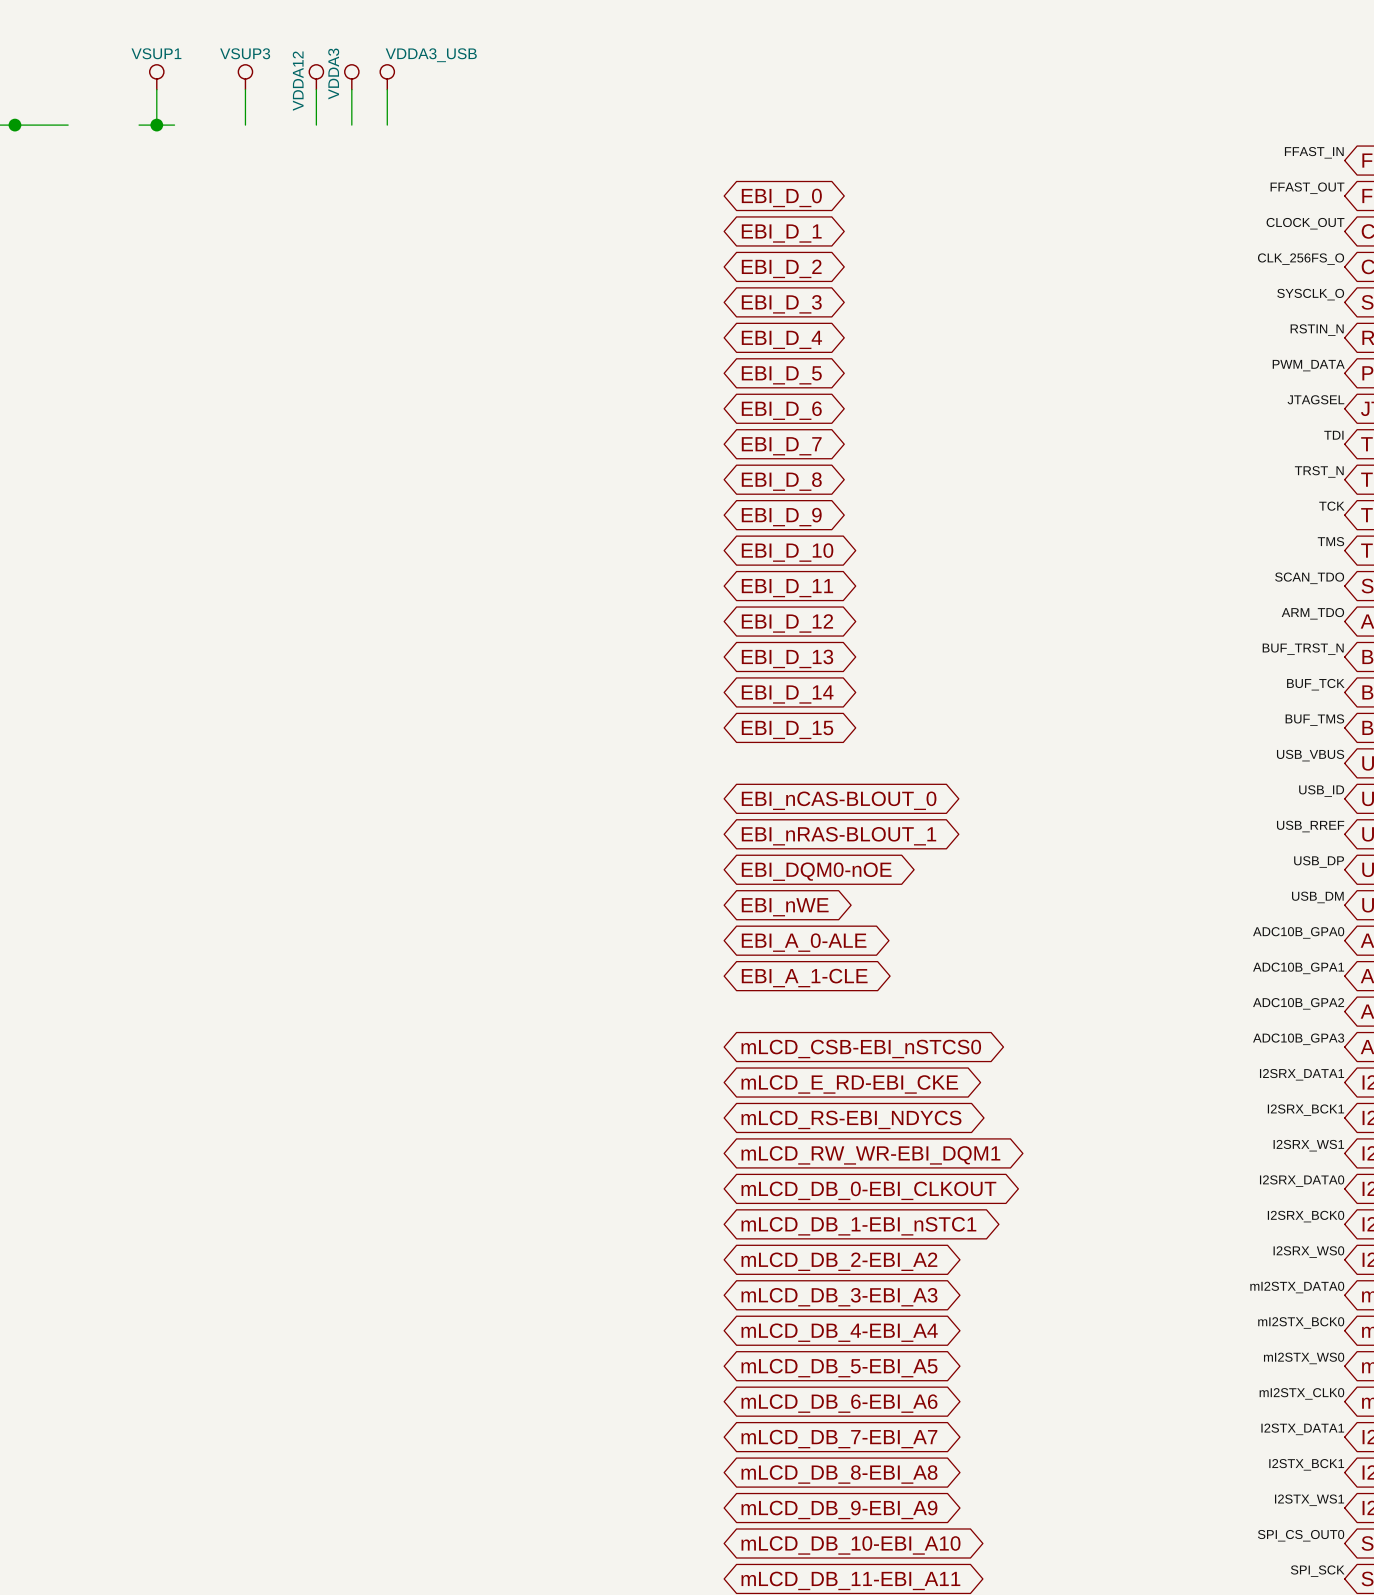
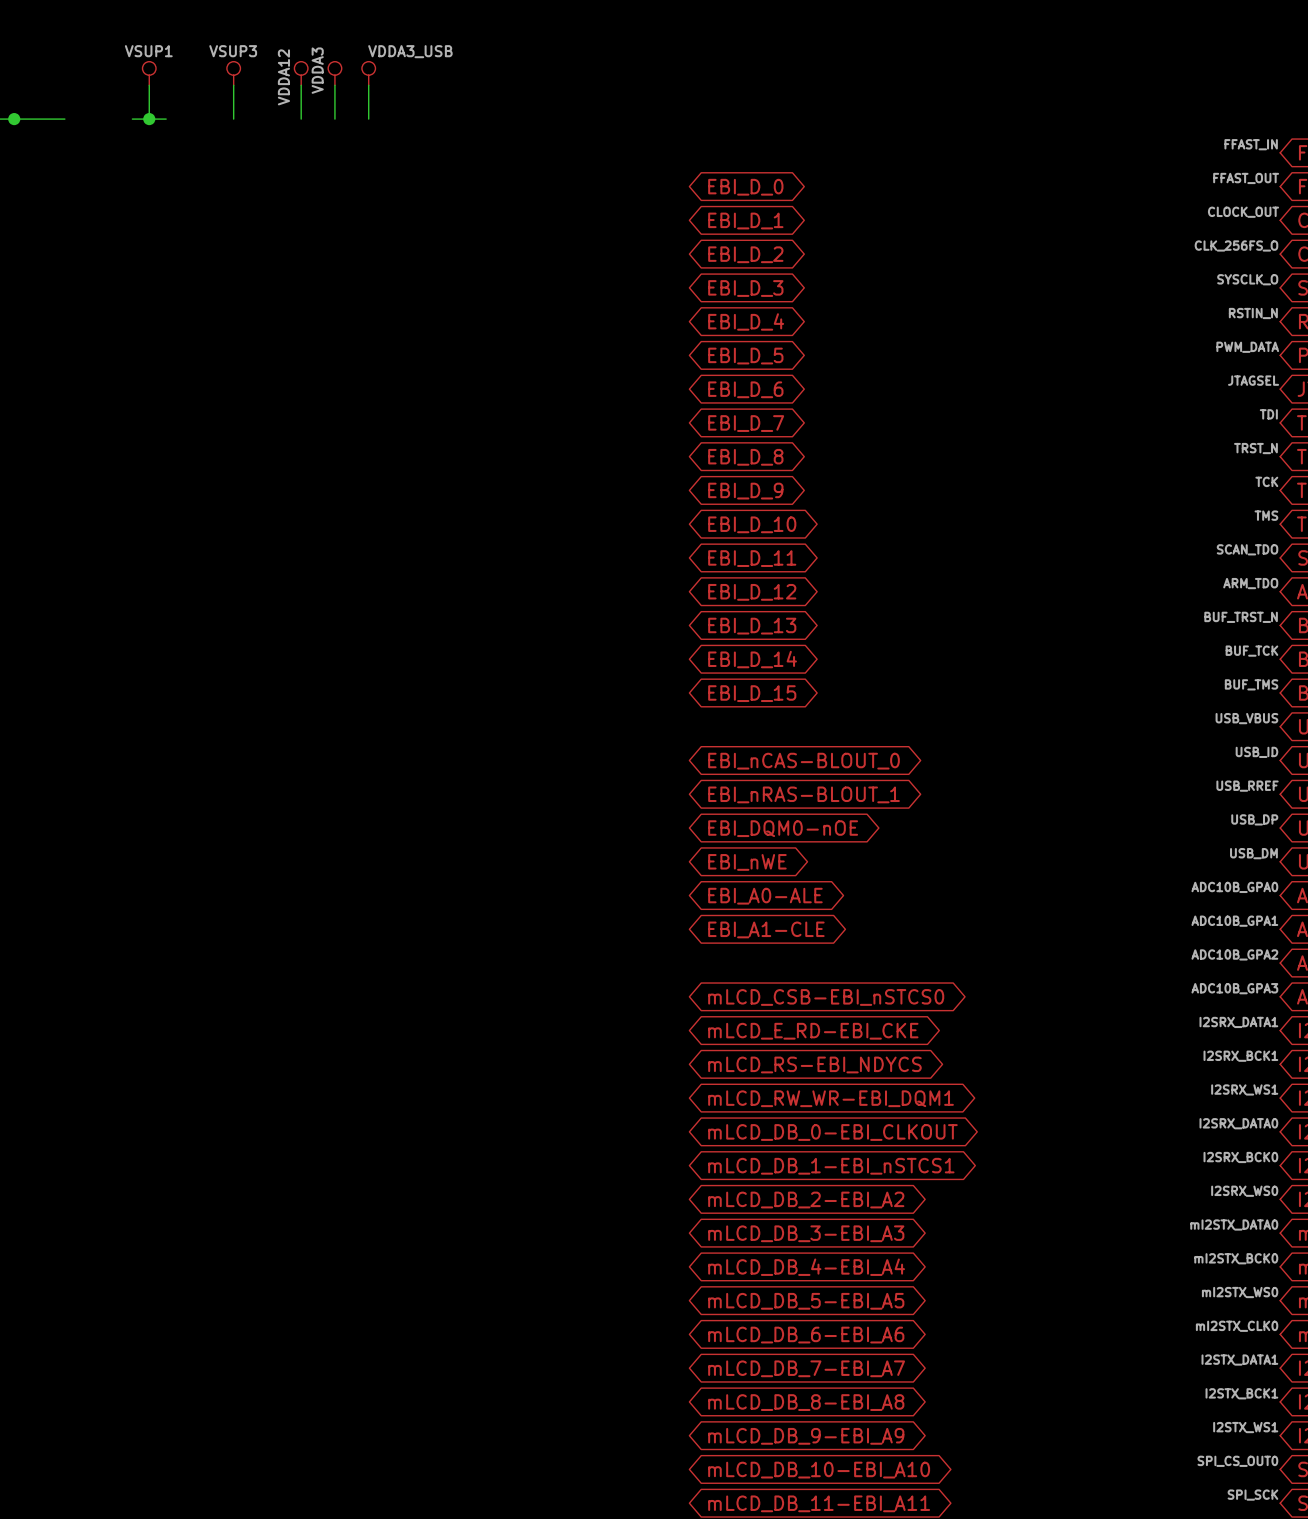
global label: EBI_A_0-ALE (804, 942) -> EBI_A0-ALE (765, 896)
global label: EBI_A_1-CLE (804, 978) -> EBI_A1-CLE (766, 929)
global label: mLCD_DB_1-EBI_nSTC1 (858, 1226) -> mLCD_DB_1-EBI_nSTCS1 (831, 1166)

